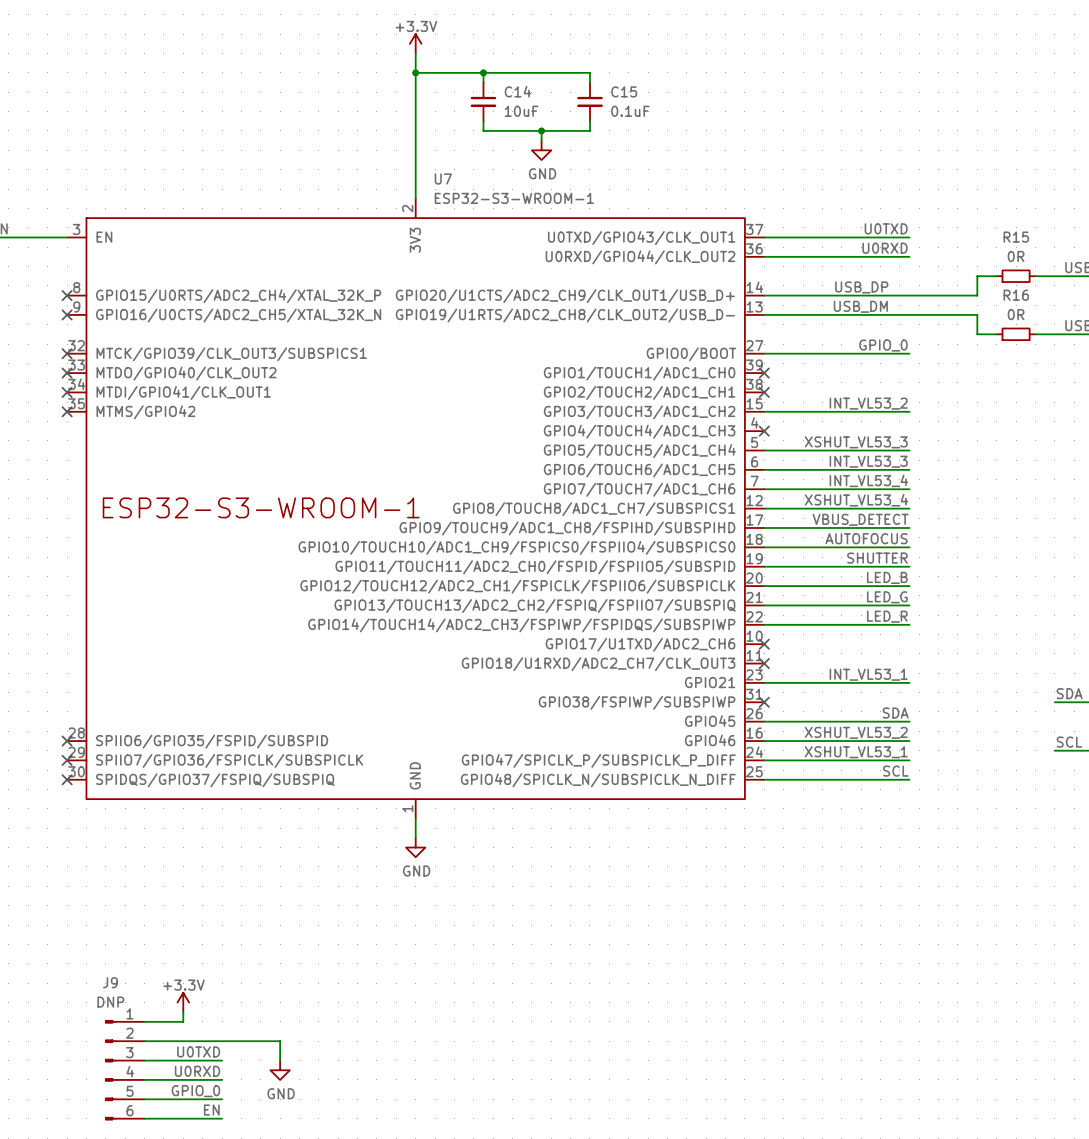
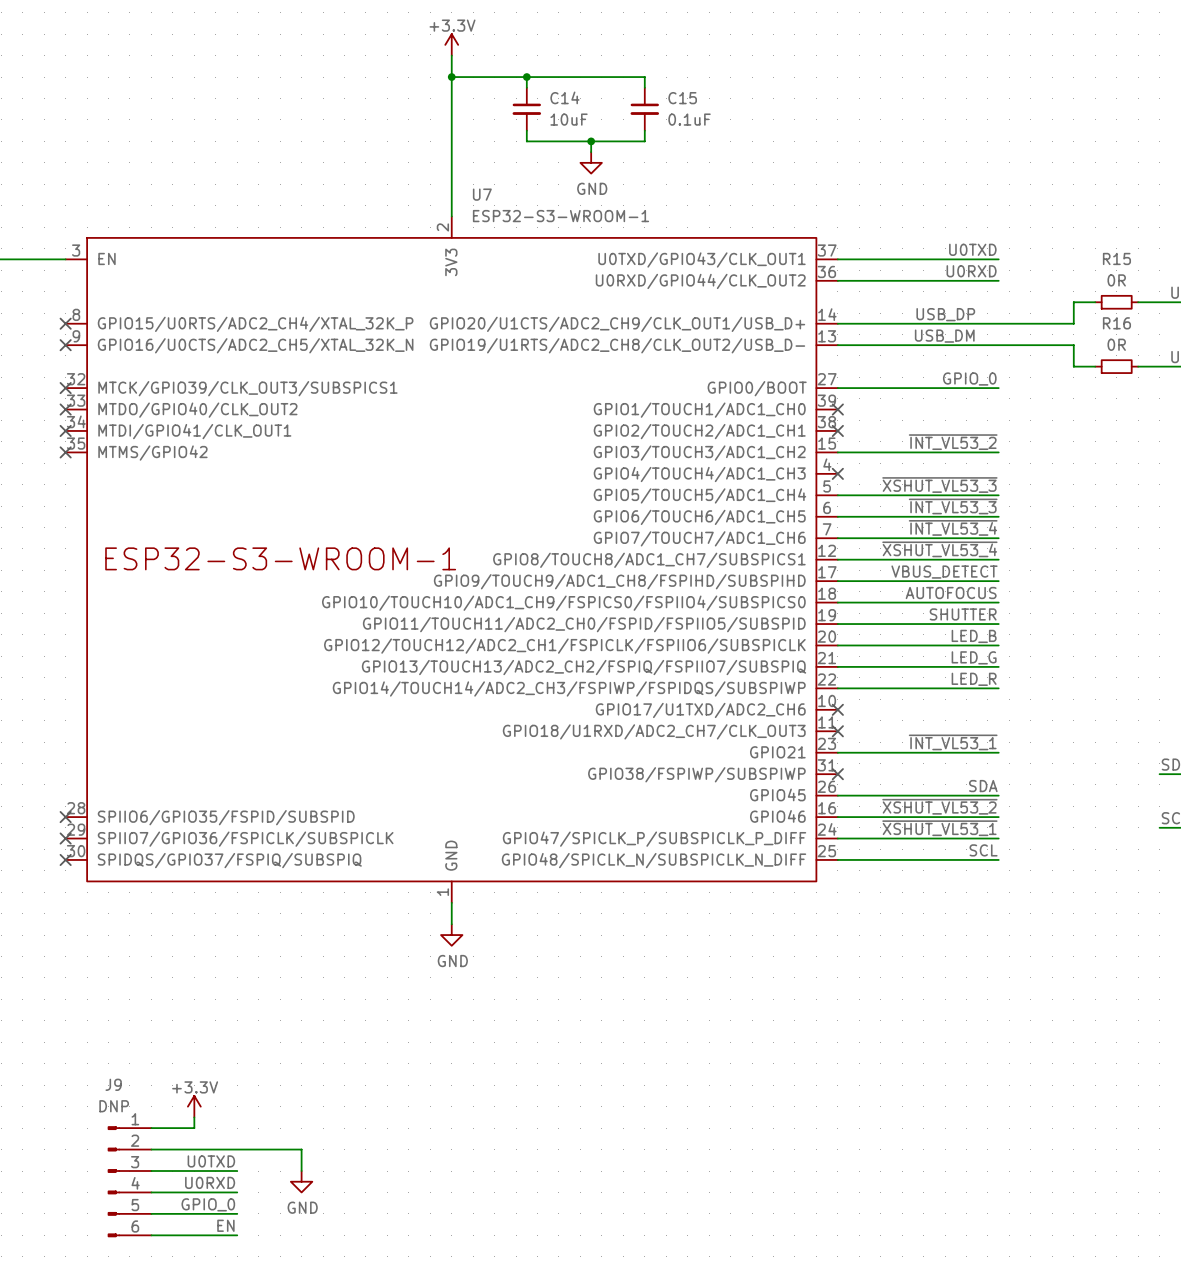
label: INT_VL53_2 (868, 403) -> ~{INT_VL53_2} (953, 442)
label: XSHUT_VL53_3 (856, 442) -> ~{XSHUT_VL53_3} (939, 485)
label: INT_VL53_3 (868, 461) -> ~{INT_VL53_3} (953, 506)
label: INT_VL53_4 (868, 480) -> ~{INT_VL53_4} (953, 527)
label: XSHUT_VL53_4 (856, 500) -> ~{XSHUT_VL53_4} (939, 549)
label: INT_VL53_1 (868, 674) -> ~{INT_VL53_1} (953, 742)
label: XSHUT_VL53_2 (856, 732) -> ~{XSHUT_VL53_2} (939, 806)
label: XSHUT_VL53_1 (856, 752) -> ~{XSHUT_VL53_1} (939, 828)

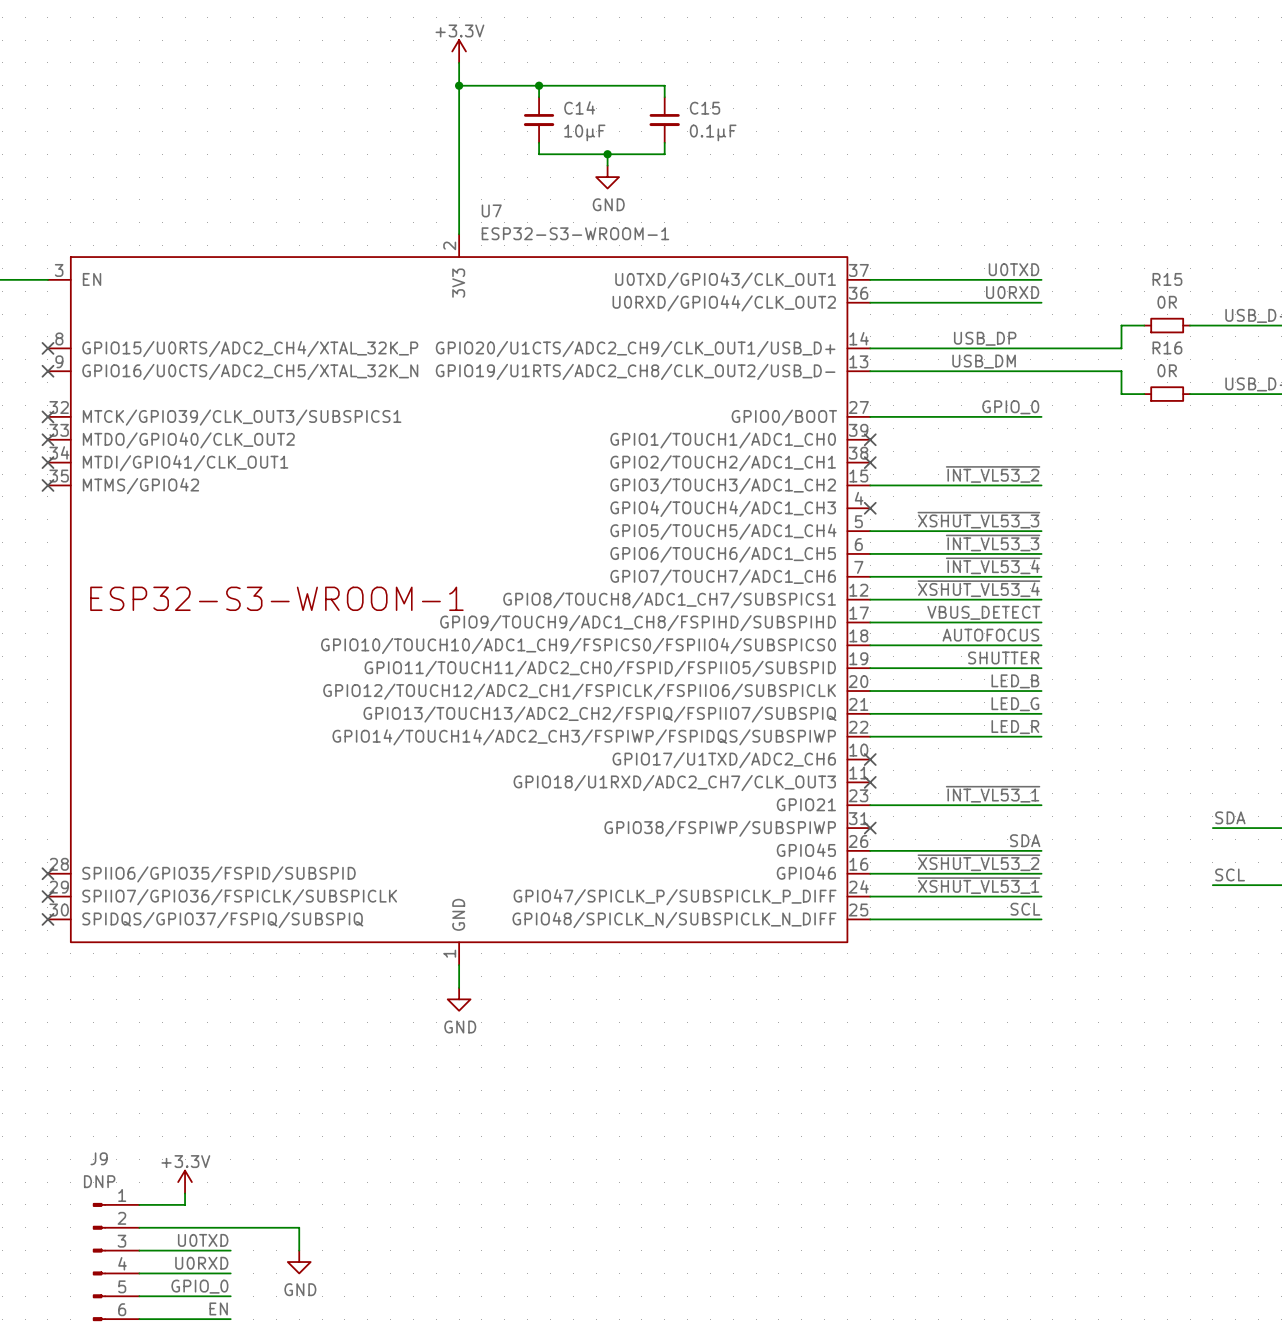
C14 value: 10uF (569, 119) -> 10µF (584, 132)
C15 value: 0.1uF (689, 119) -> 0.1µF (713, 132)

